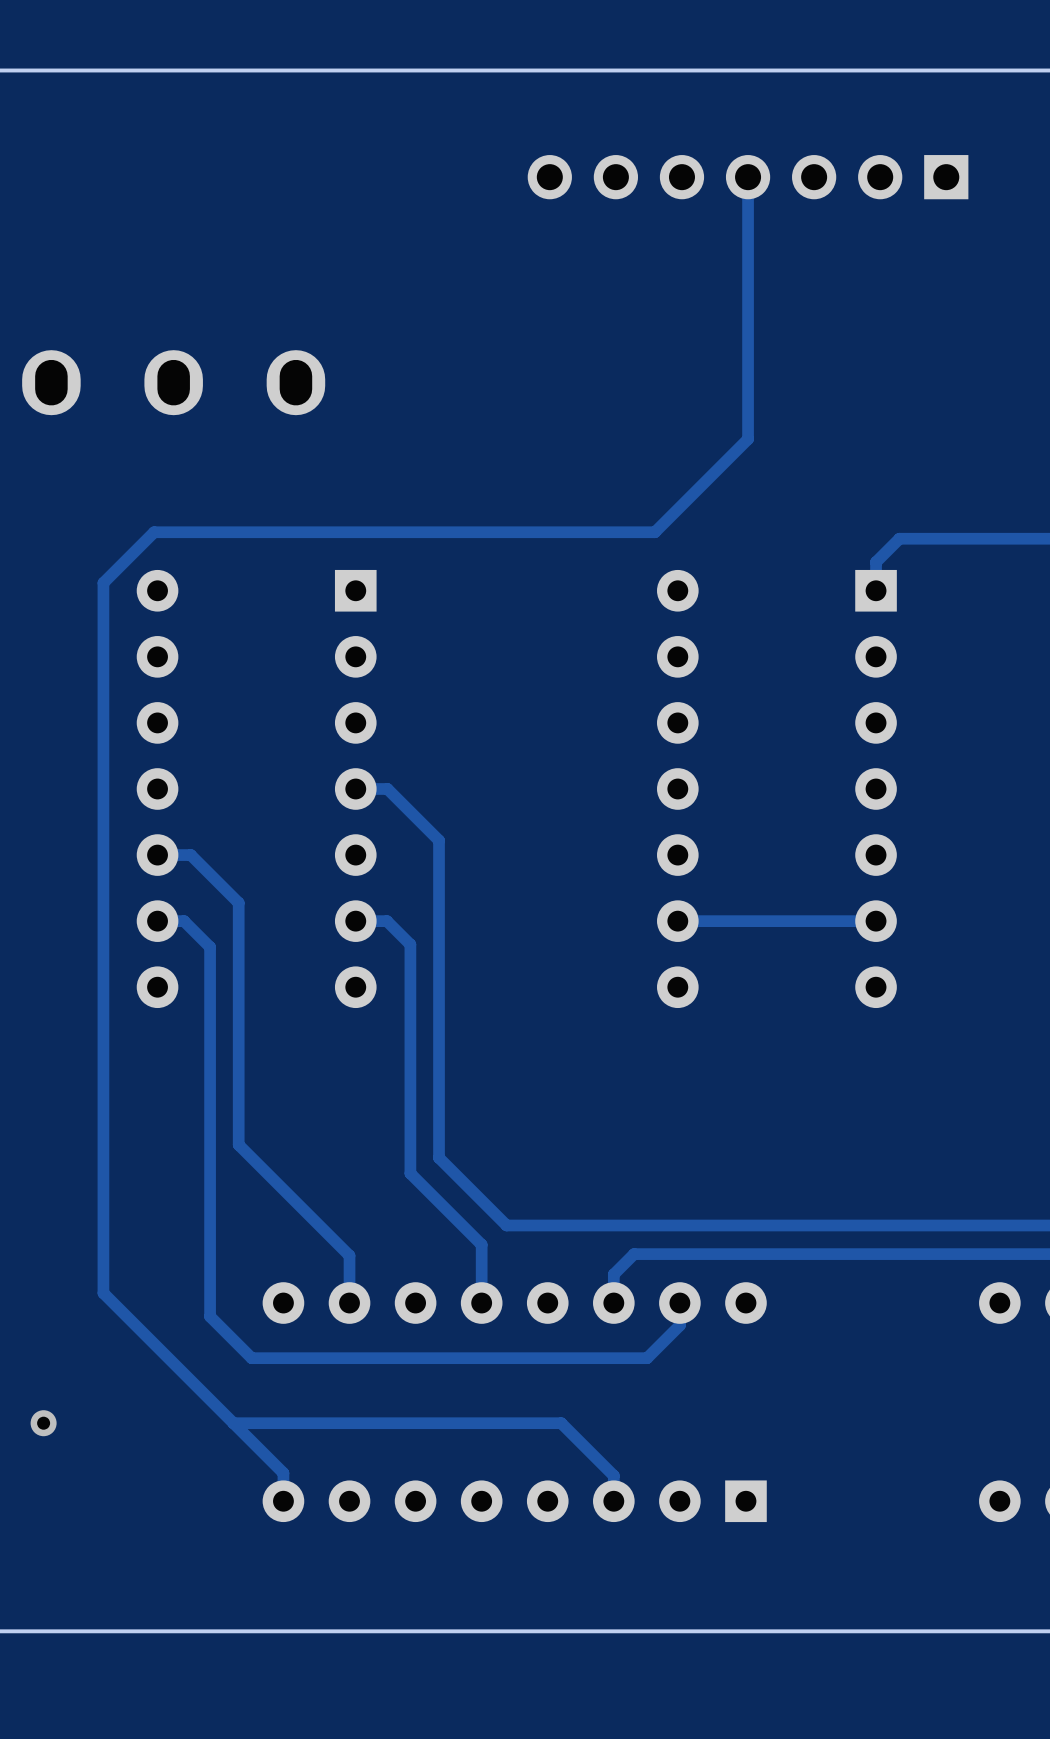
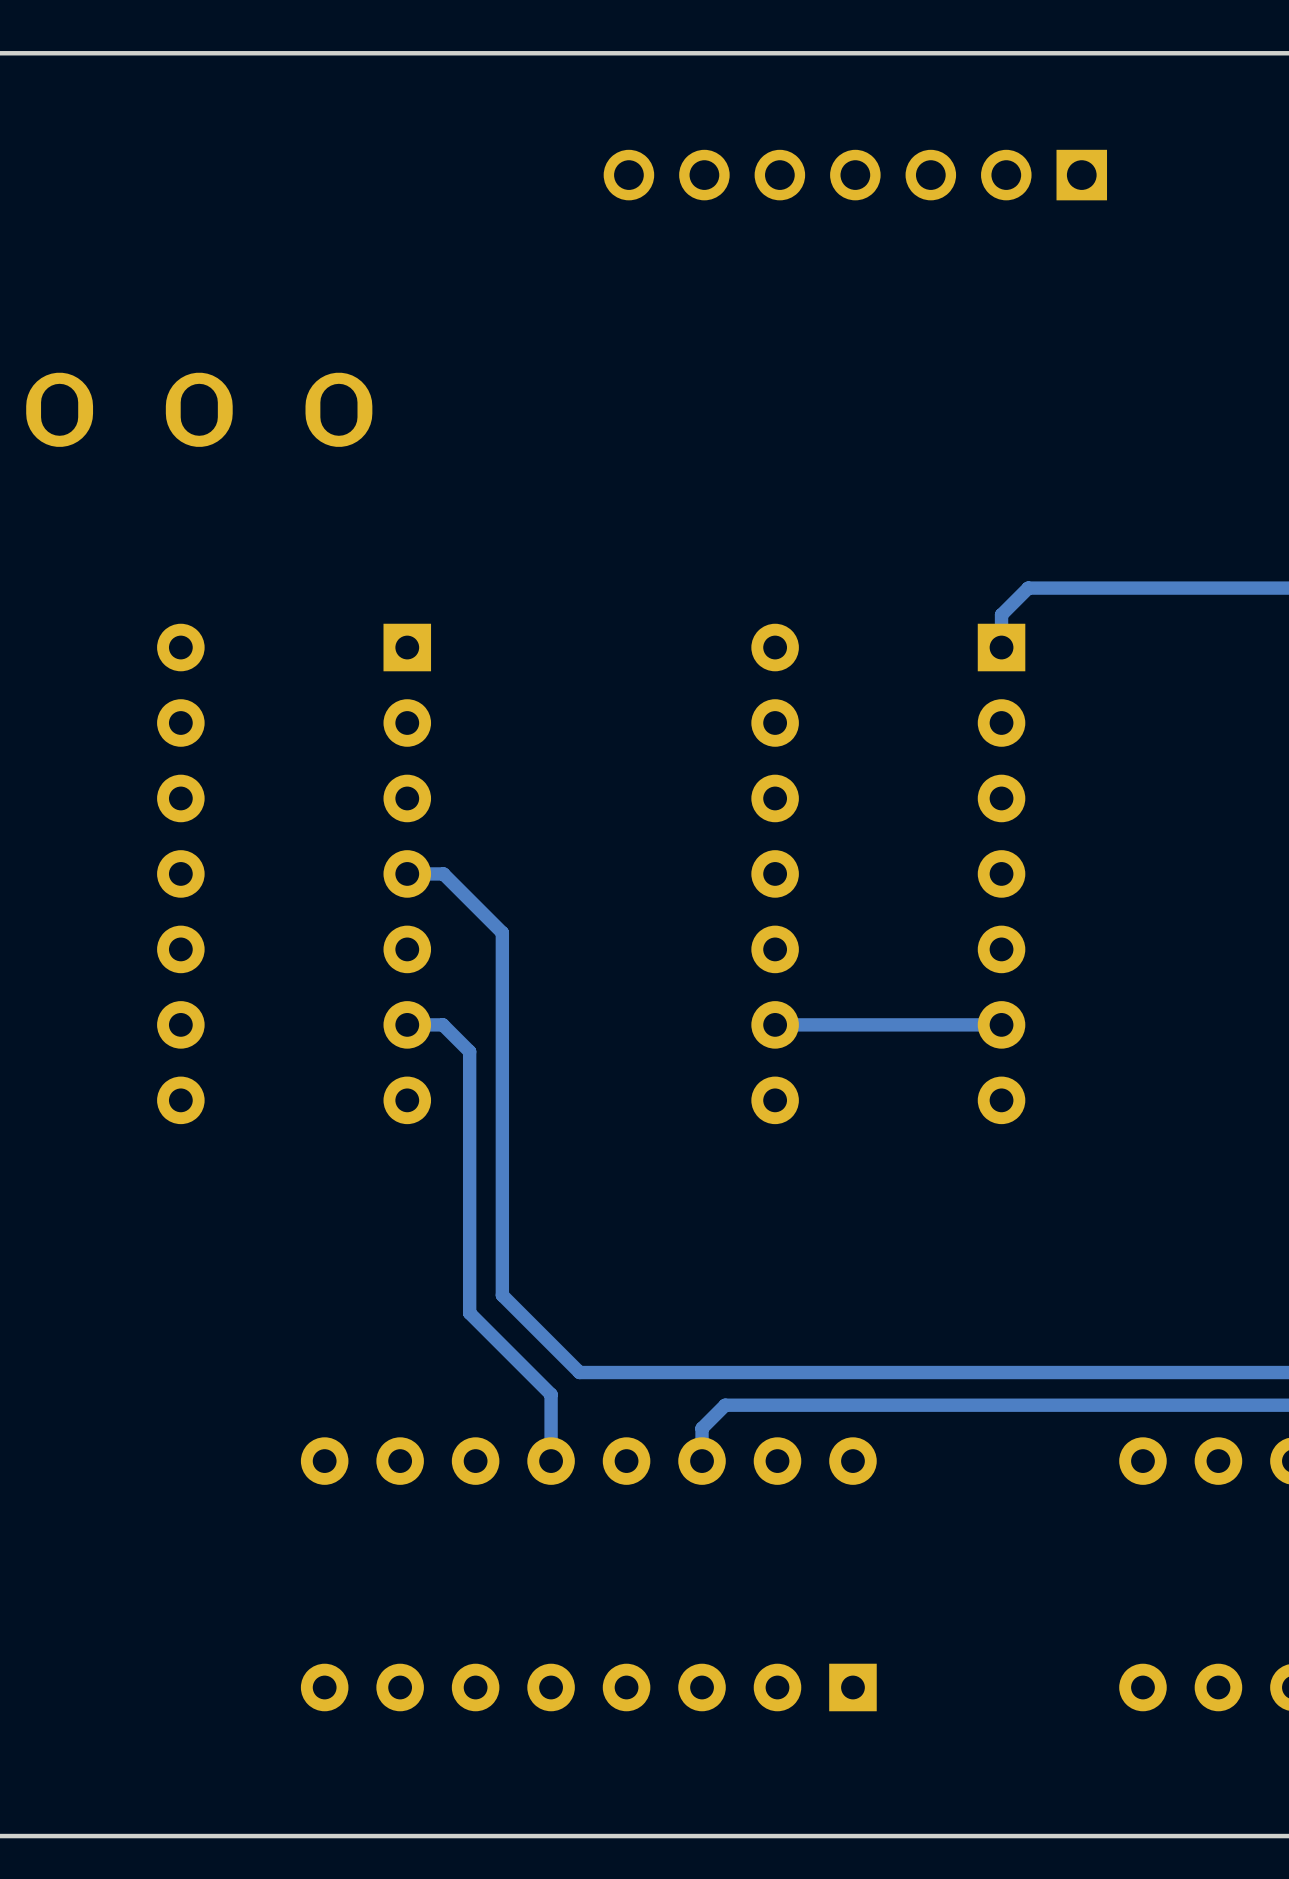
track: (748, 177) (748, 439) (654, 532) (154, 532) (103, 582) (103, 1293) (283, 1473) (283, 1501) -> none
track: (157, 855) (190, 855) (238, 902) (238, 1144) (349, 1255) (349, 1303) -> none
track: (157, 921) (184, 921) (210, 947) (210, 1316) (251, 1358) (647, 1358) (679, 1325) (679, 1303) -> none
via: (43, 1423) -> none
track: (233, 1423) (561, 1423) (613, 1475) (613, 1501) -> none

